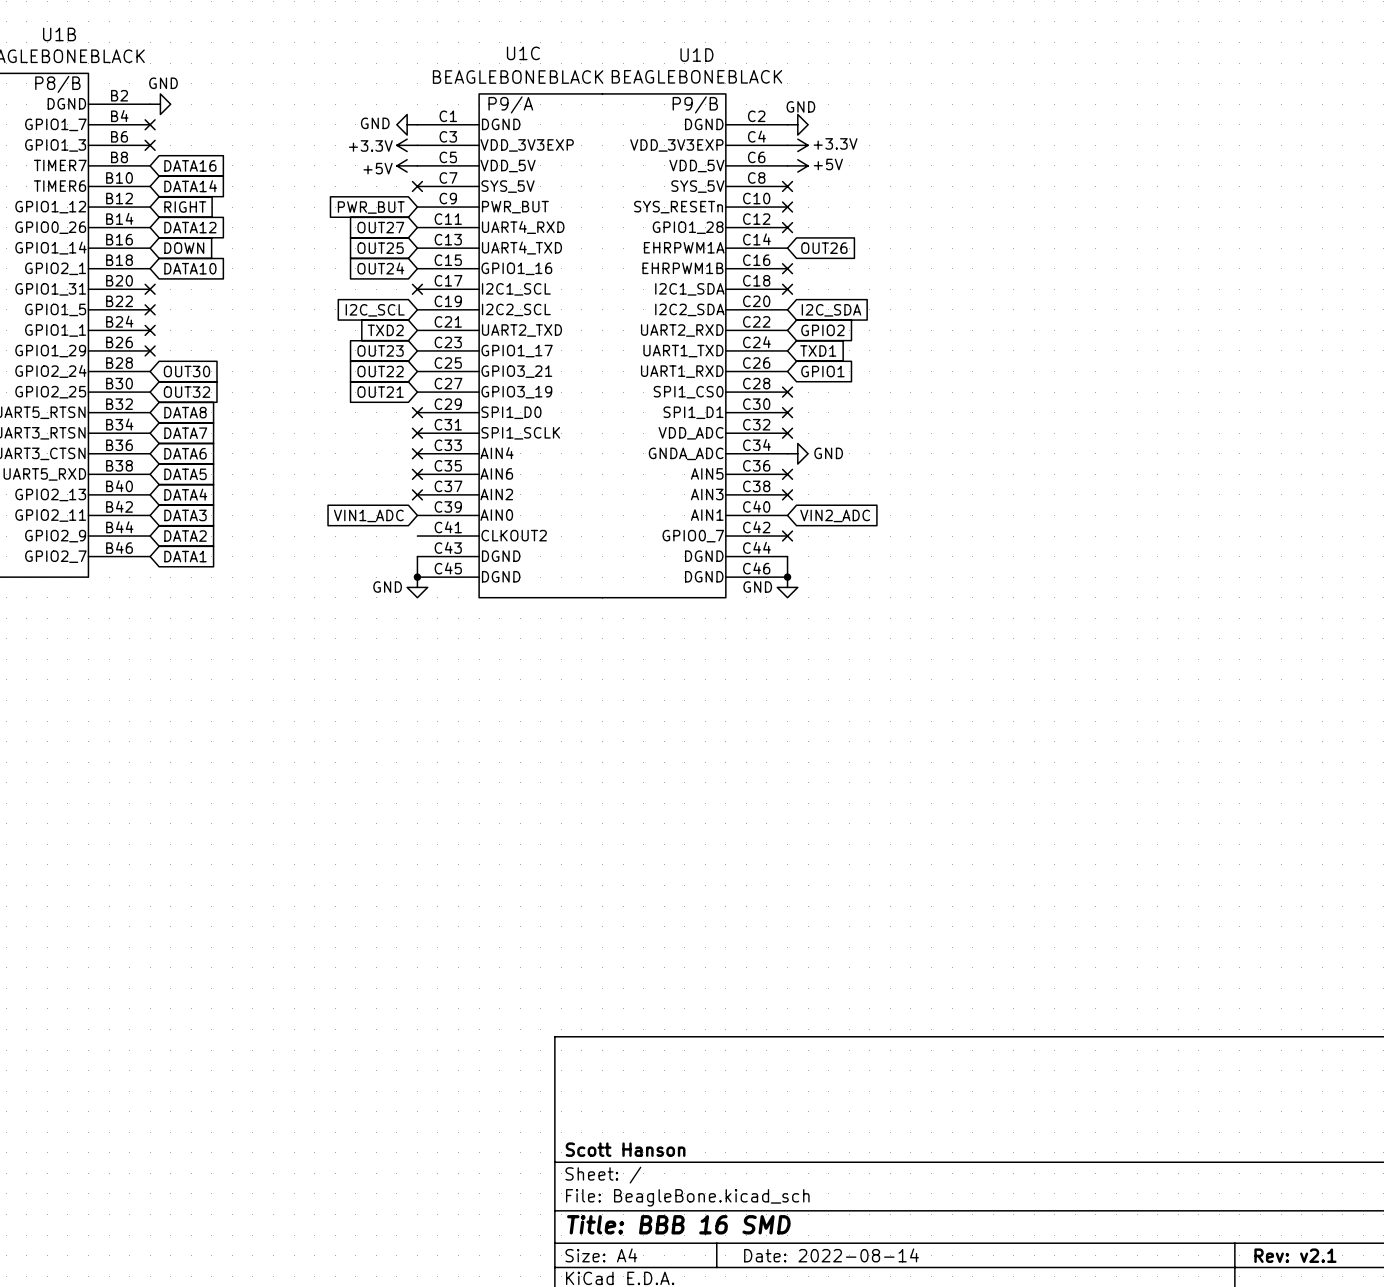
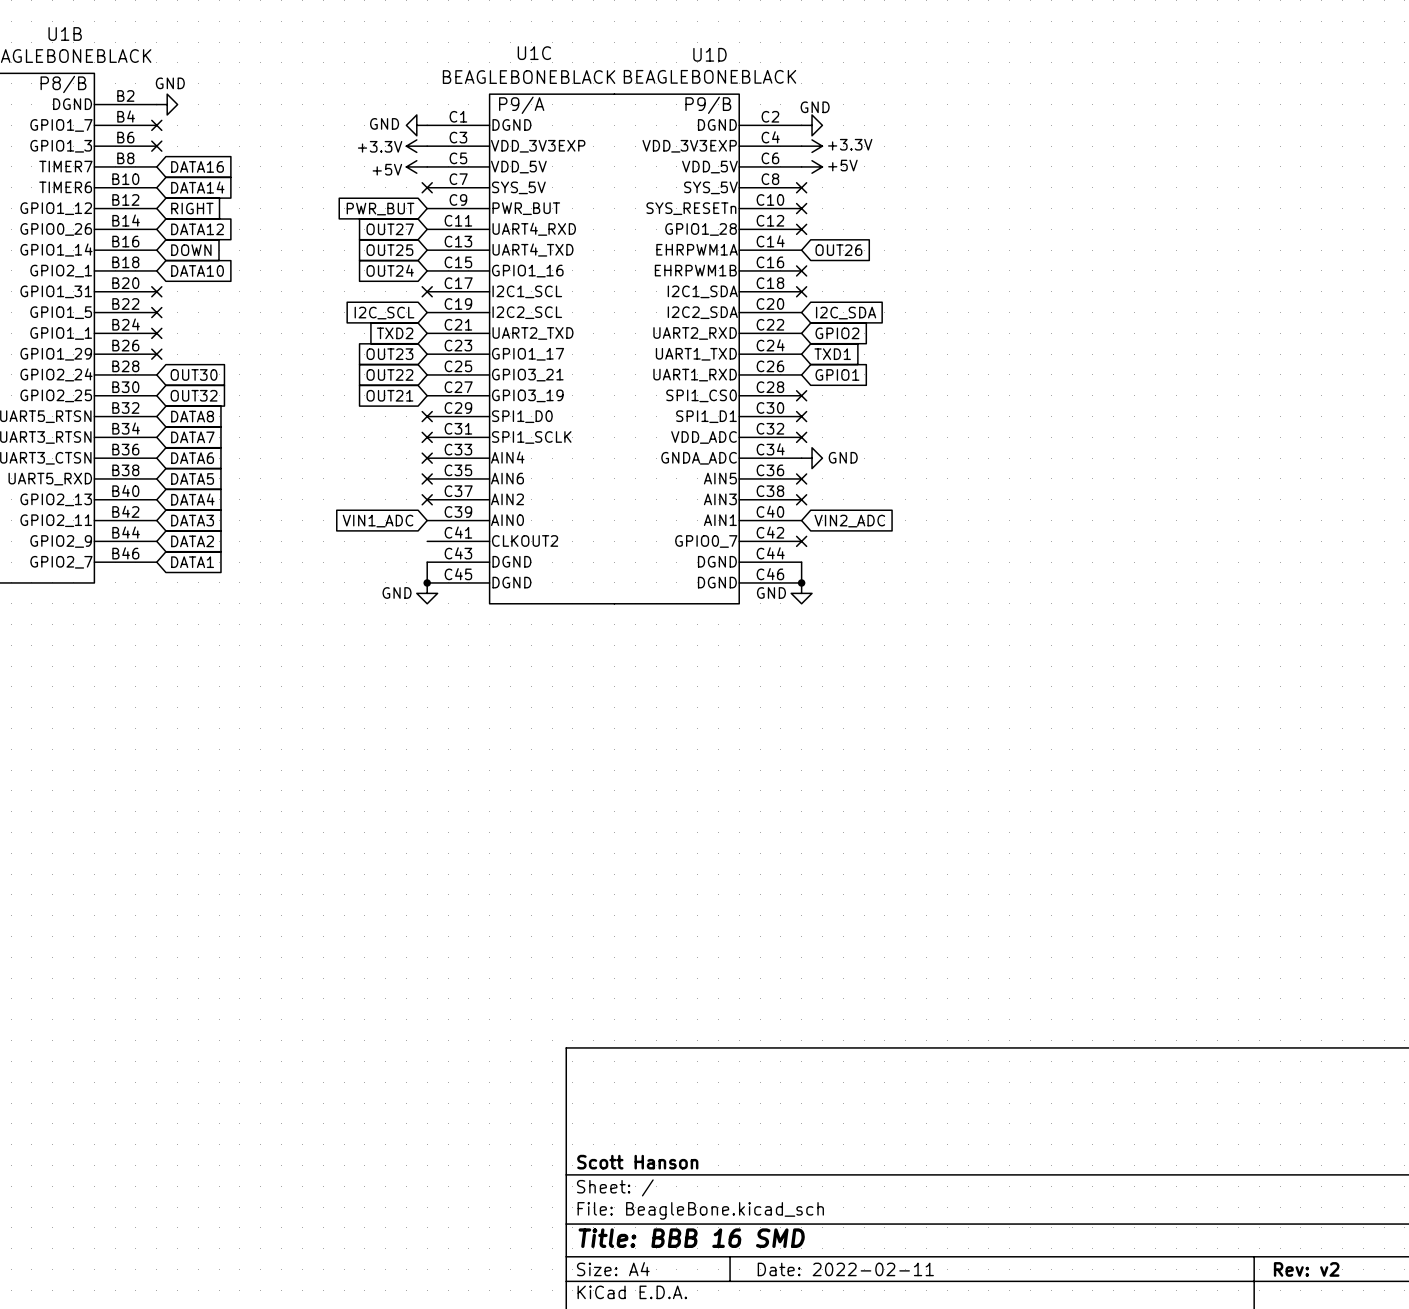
title block: Date: 2022-08-14 (831, 1255) -> Date: 2022-02-11 (845, 1269)
title block: Rev: v2.1 (1295, 1255) -> Rev: v2 (1306, 1269)

